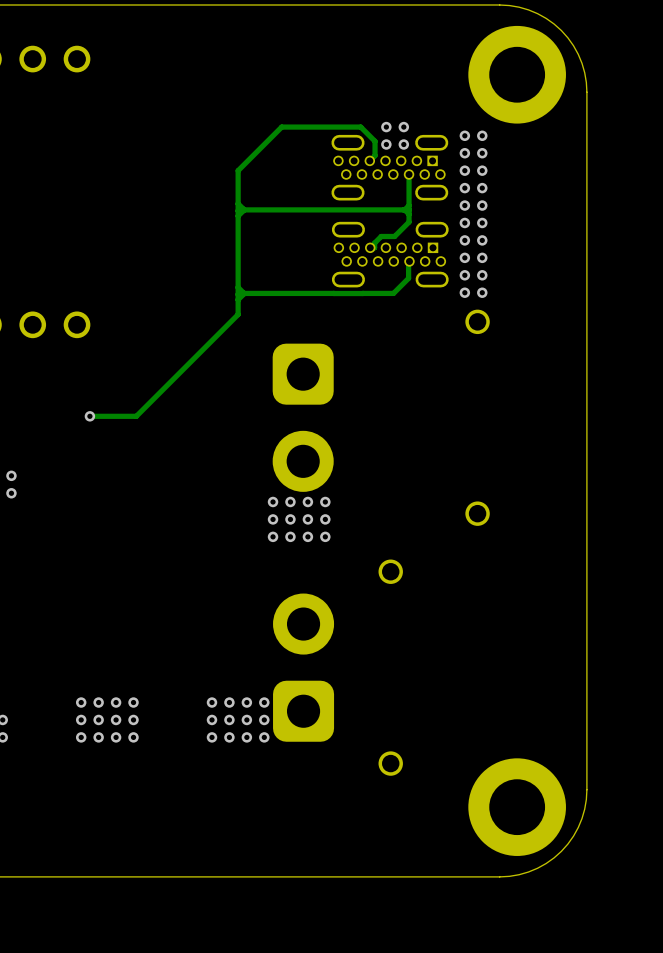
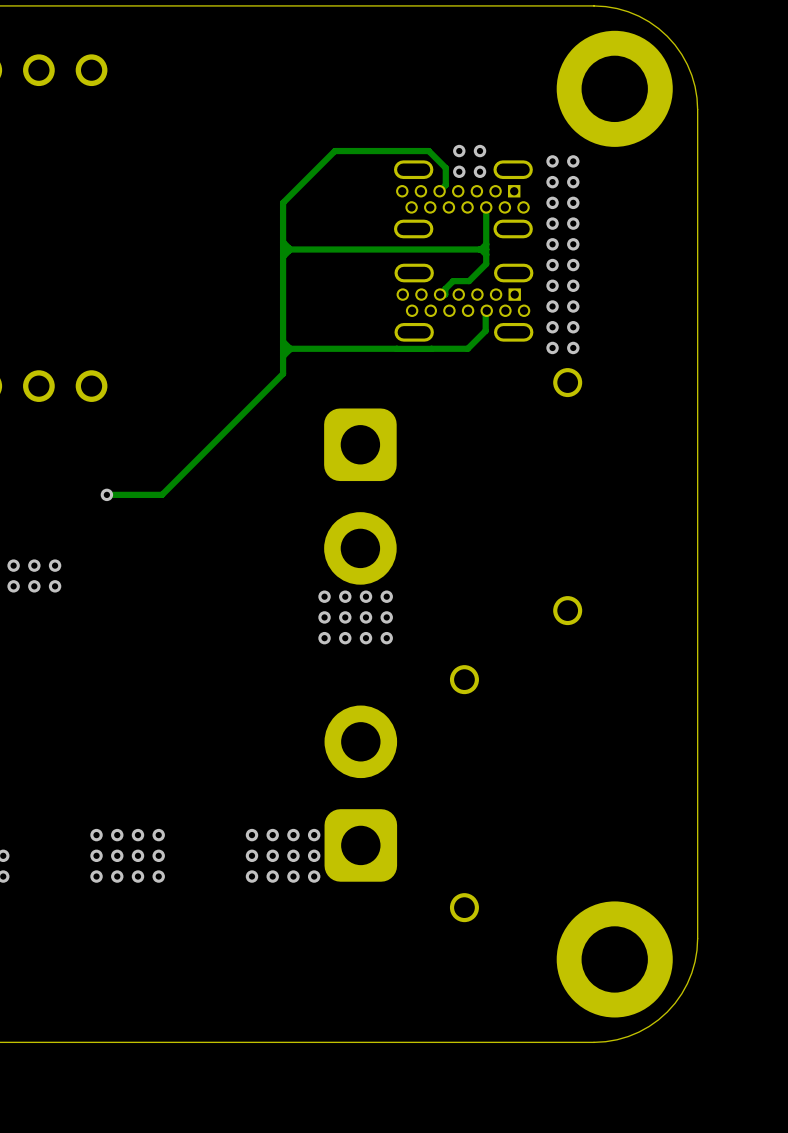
via: none -> (34, 565)
via: none -> (55, 565)
via: none -> (34, 586)
via: none -> (55, 586)

